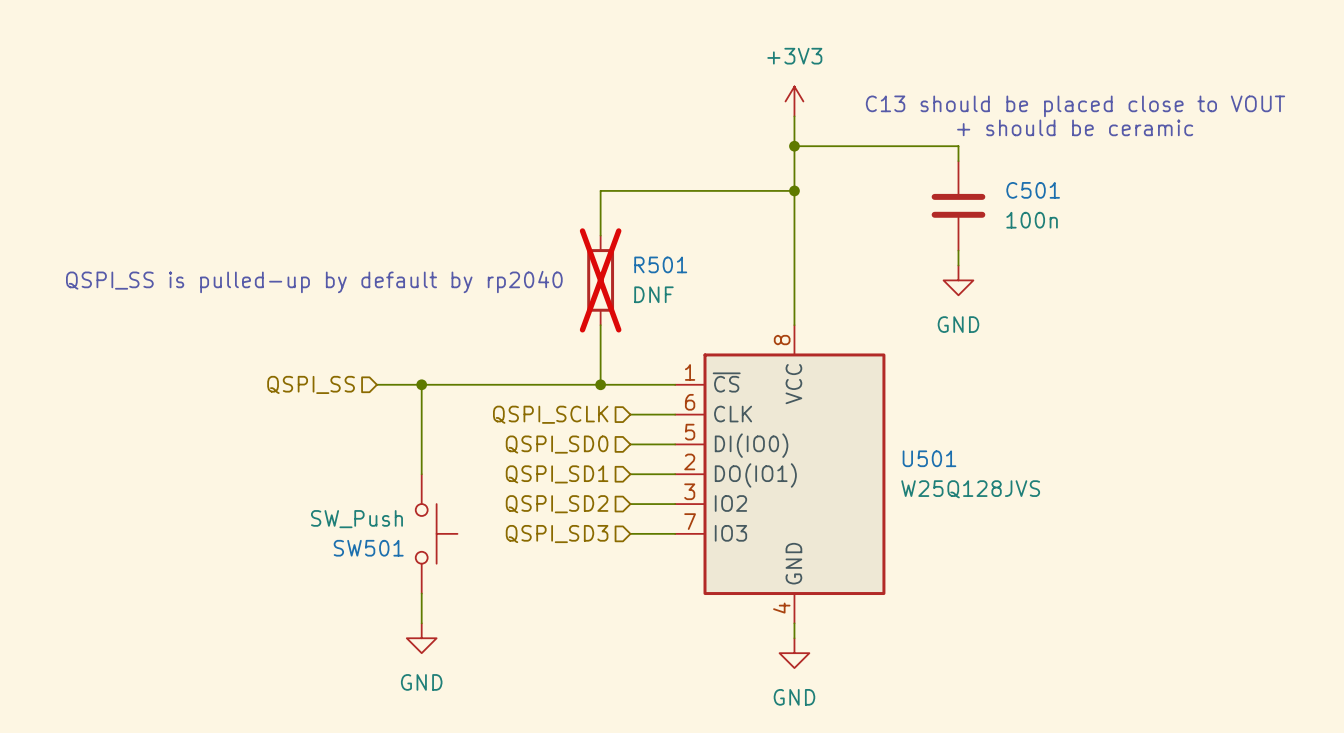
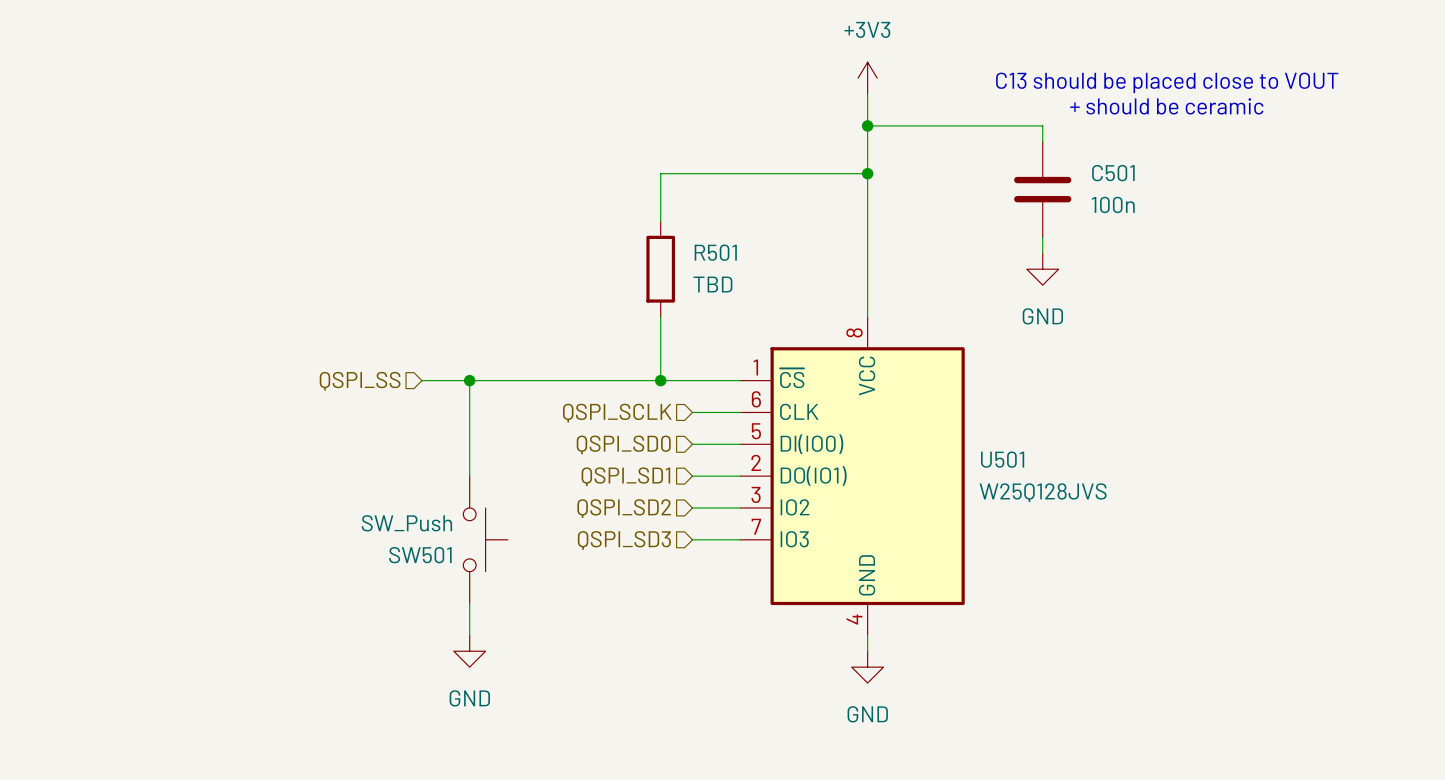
R501 do-not-place cross: (600, 280) -> none
text: QSPI_SS is pulled-up by default by rp2040 (314, 282) -> none
R501 value: DNF (653, 294) -> TBD (712, 284)

